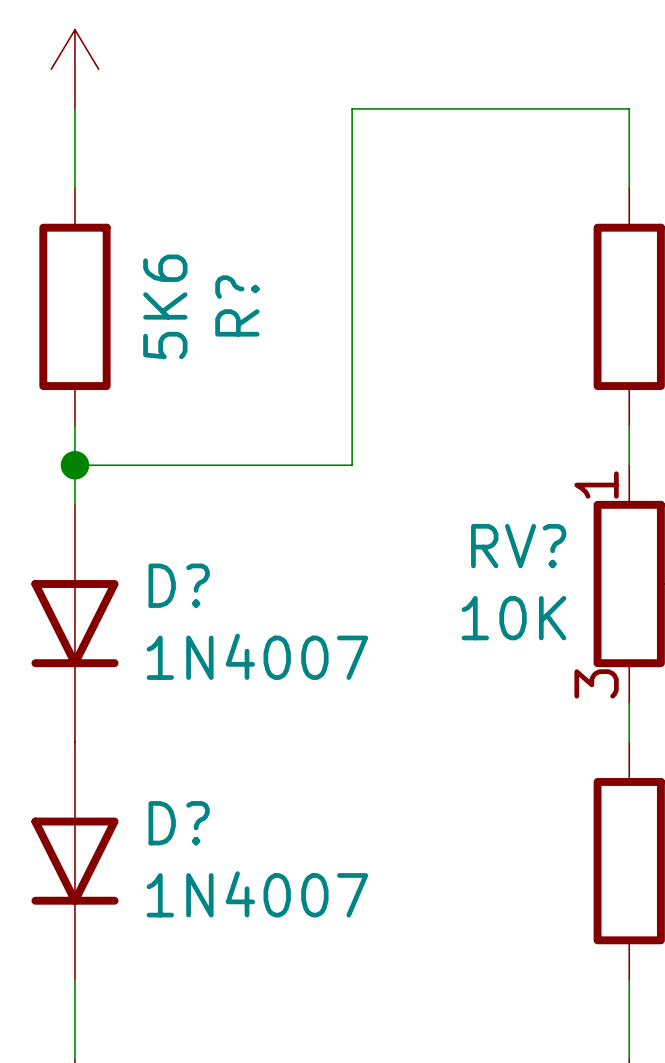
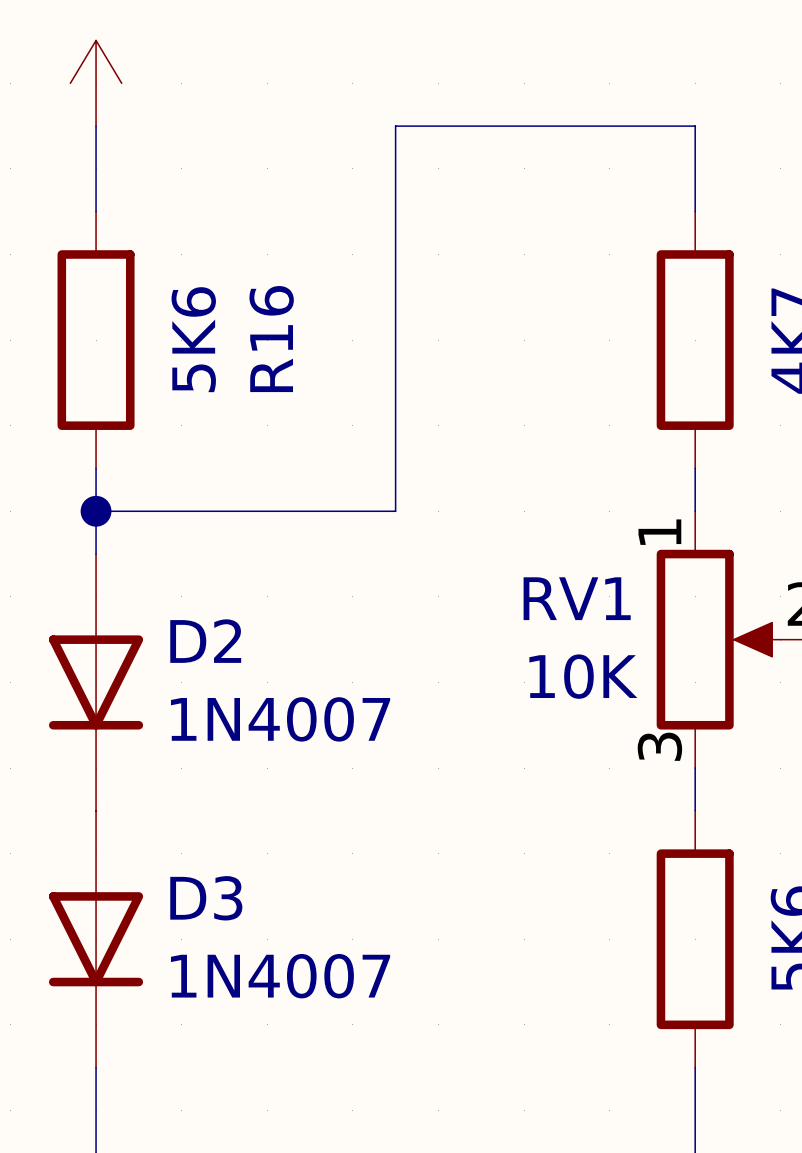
R? name: R? (237, 305) -> R16 (271, 339)
RV? name: RV? (518, 546) -> RV1 (577, 598)
D? name: D? (179, 585) -> D2 (205, 641)
D? name: D? (179, 823) -> D3 (206, 898)

